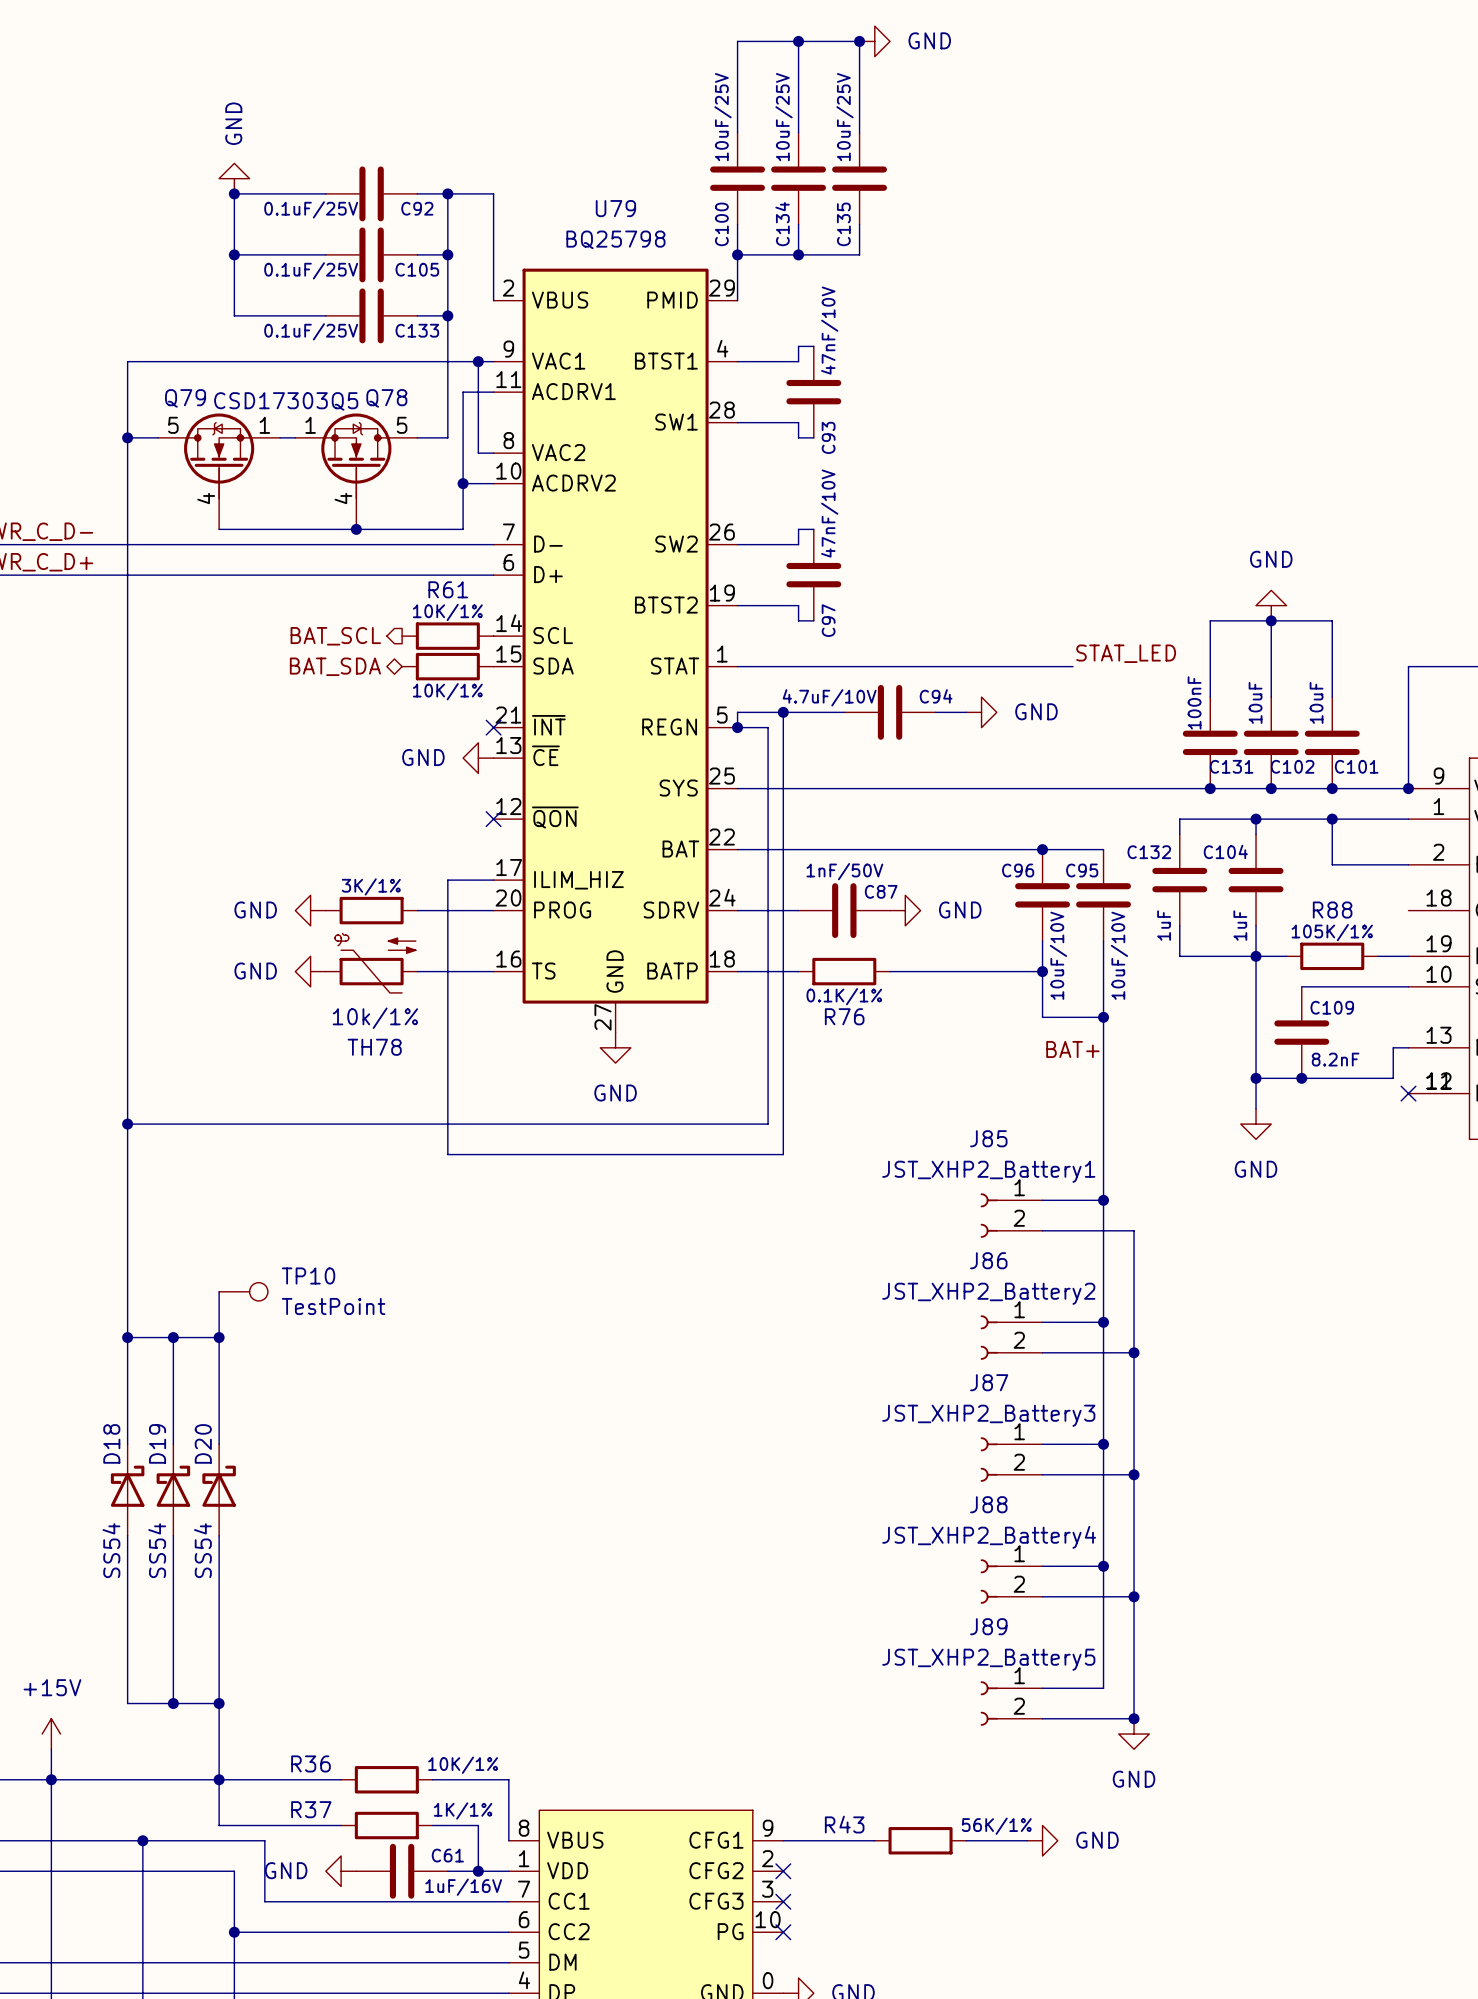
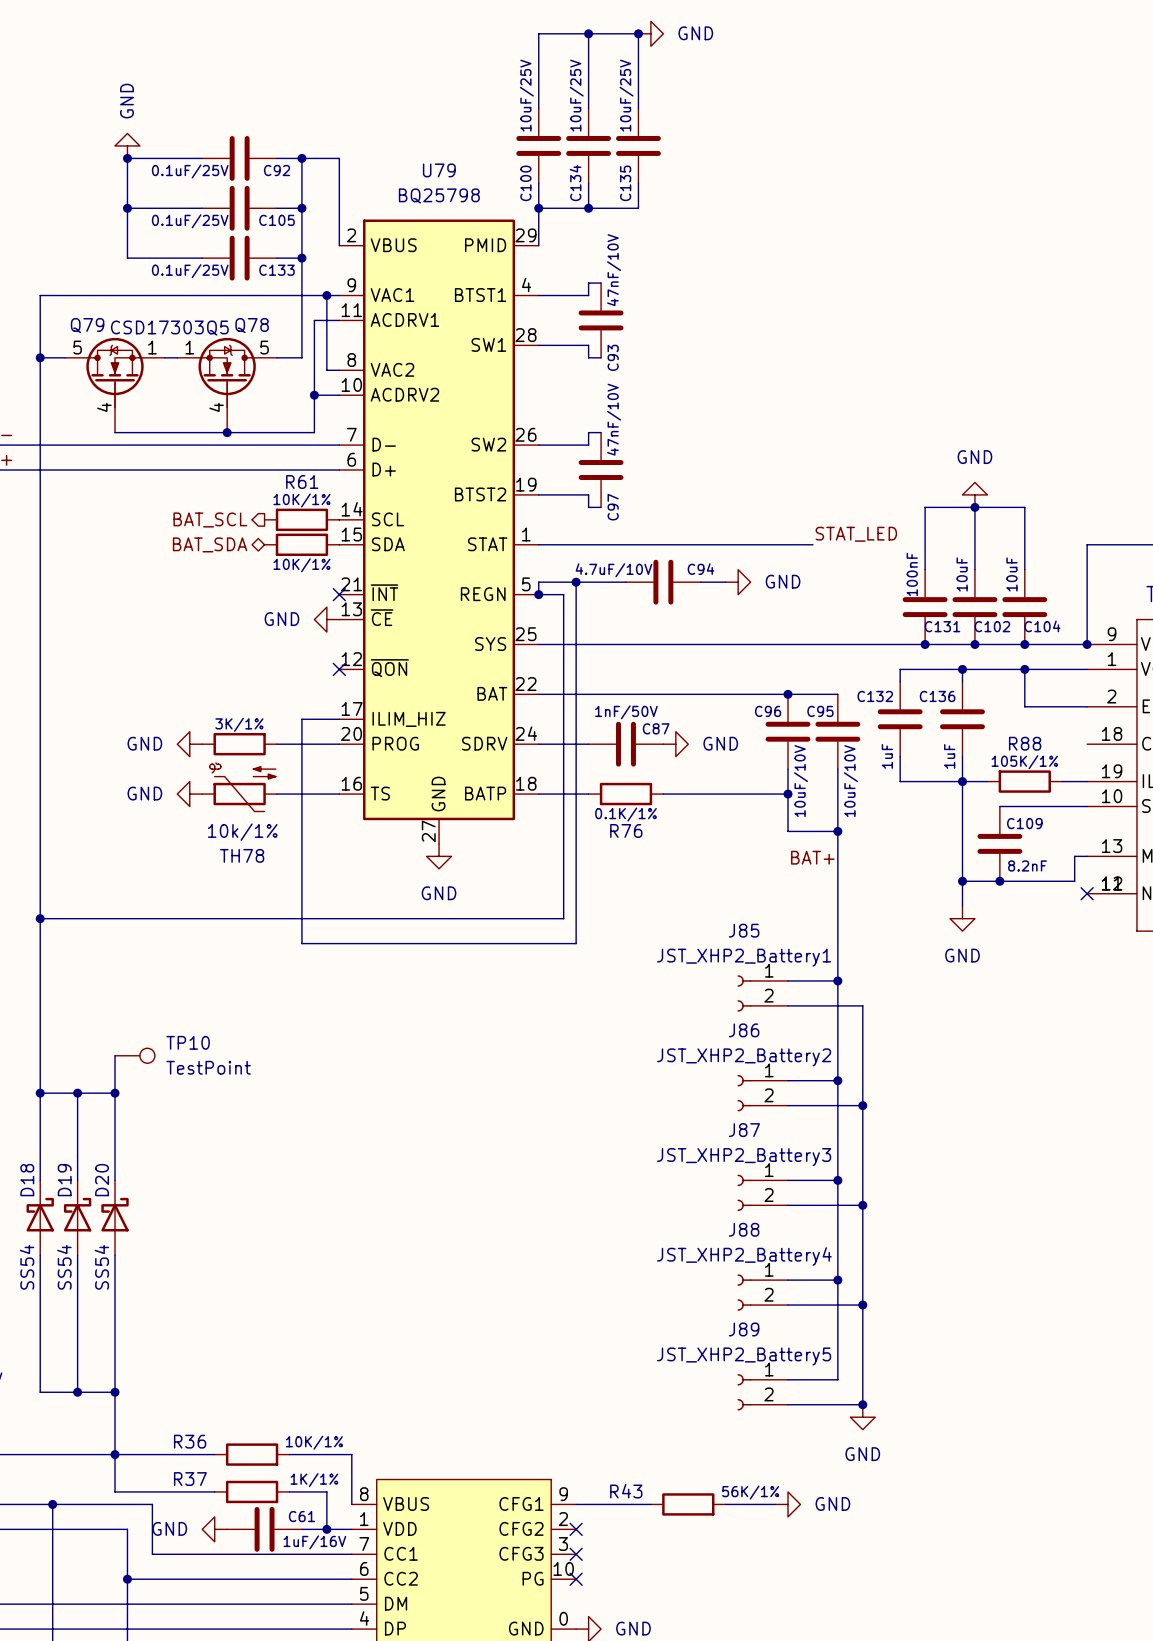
C101 name: C101 (1356, 766) -> C104 (1042, 626)
C104 name: C104 (1225, 851) -> C136 (937, 696)

